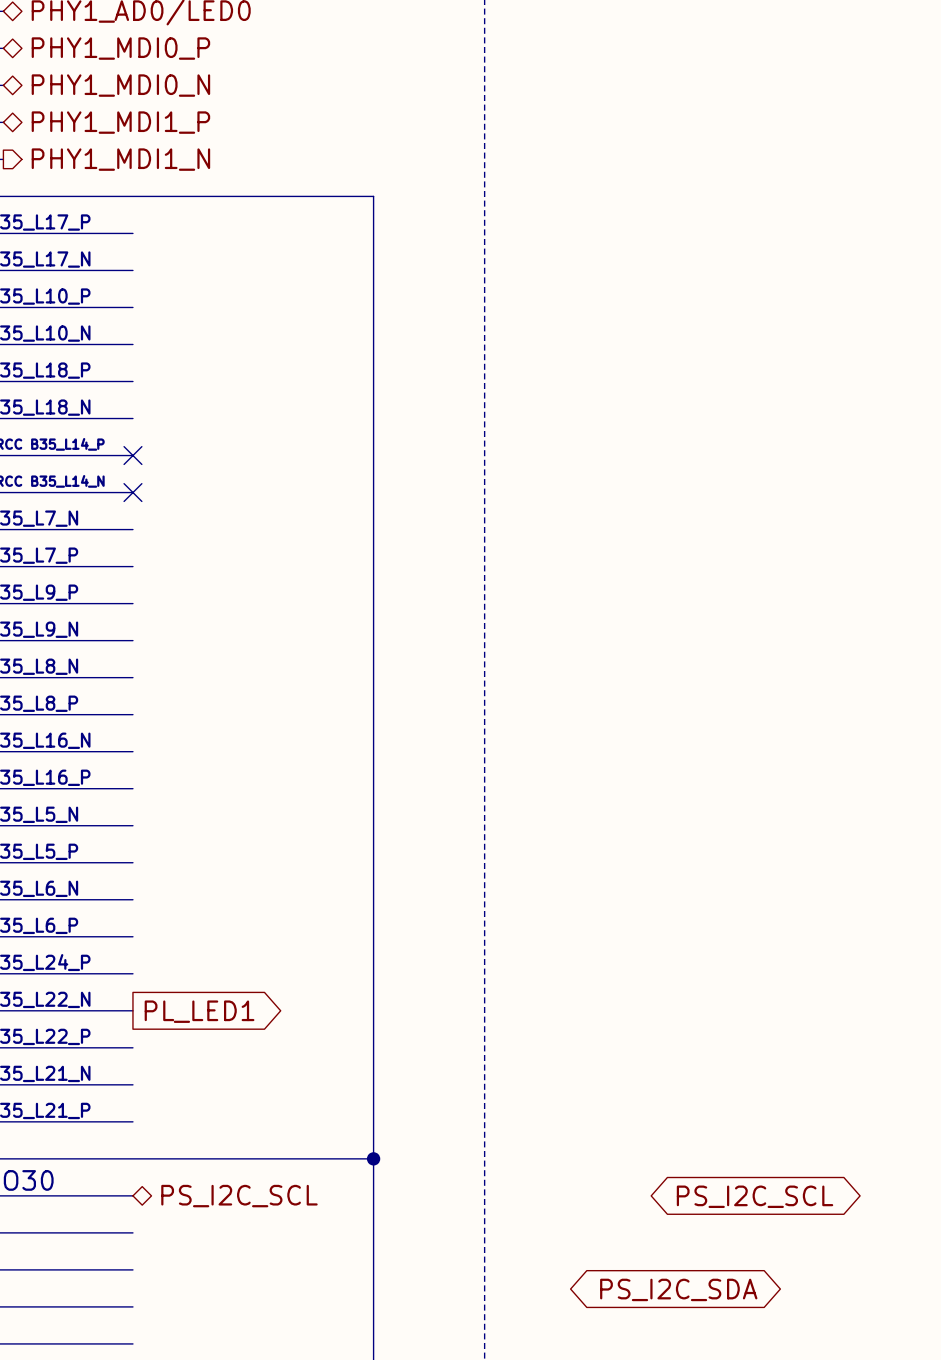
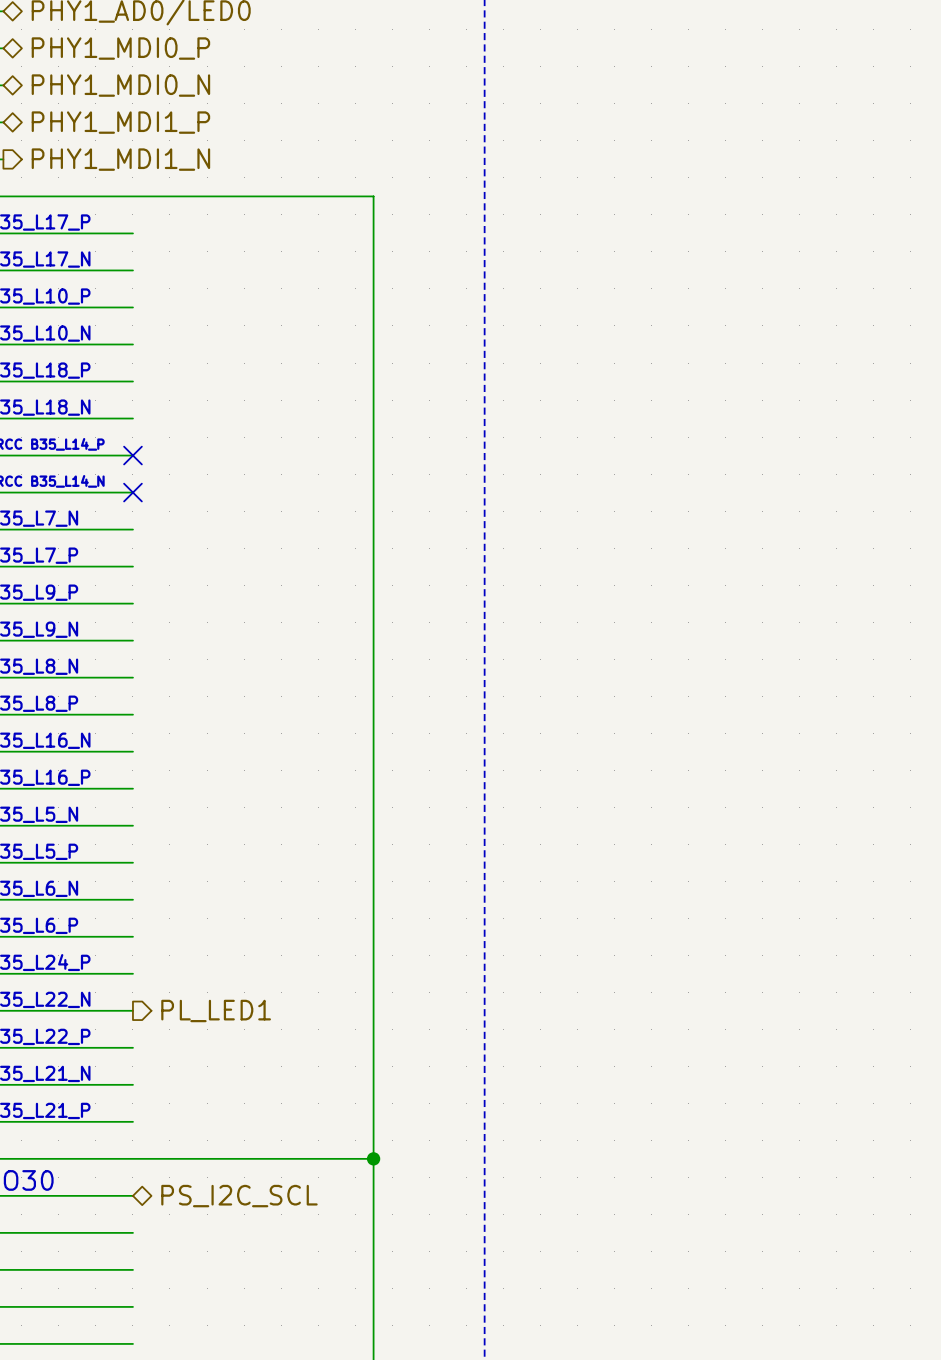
hierarchical label: none -> PL_LED1 (216, 1010)
global label: PL_LED1 (199, 1011) -> none
global label: PS_I2C_SCL (755, 1196) -> none
global label: PS_I2C_SDA (678, 1289) -> none

